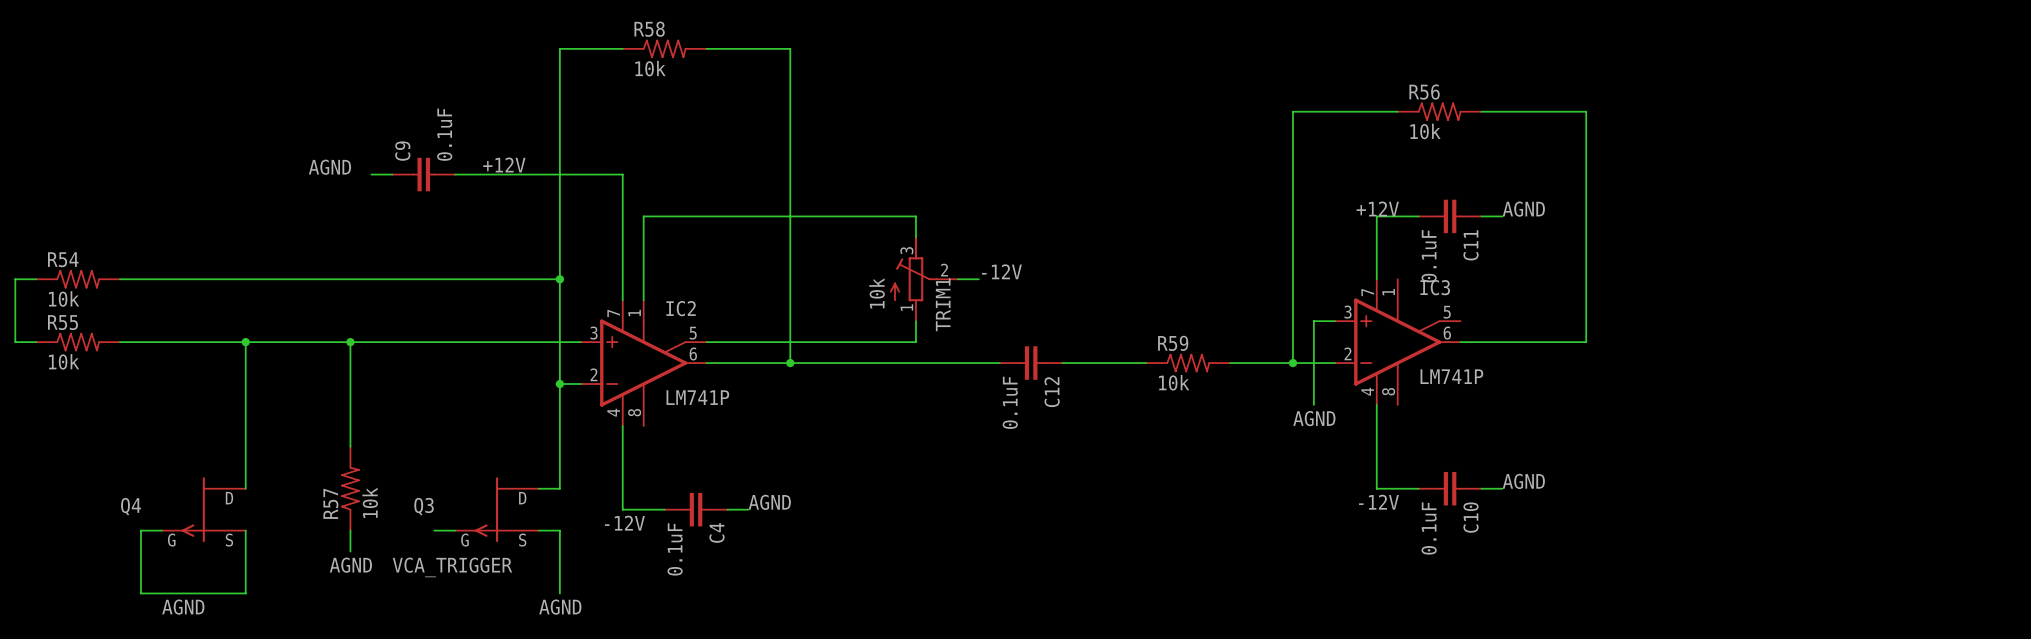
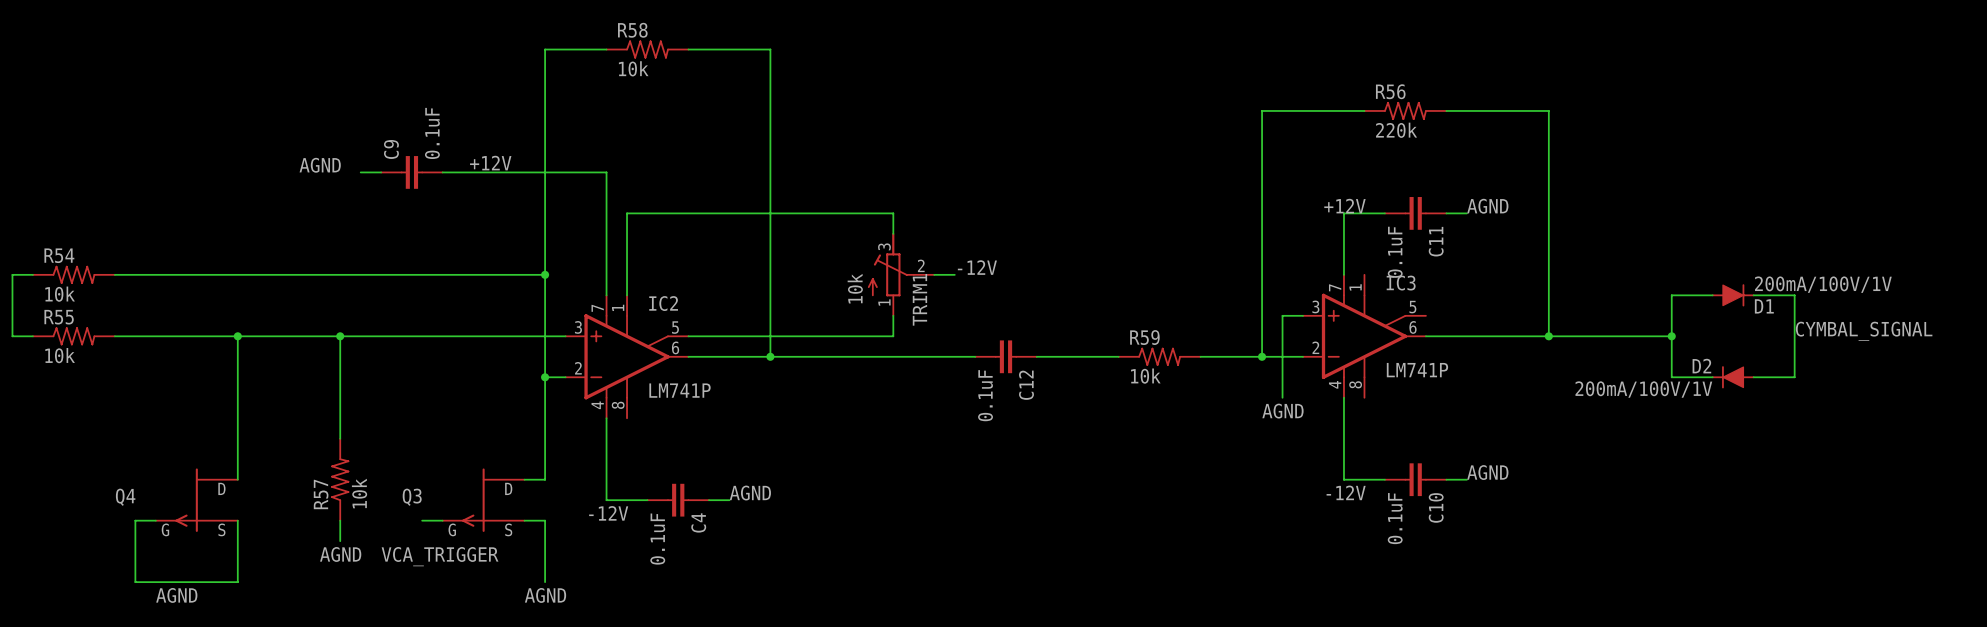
R56 value: 10k (1425, 131) -> 220k (1396, 130)
wire: none -> (1712, 295) (1671, 295) (1671, 377) (1712, 377)
D1: none -> 200mA/100V/1V (1733, 295)
wire: none -> (1753, 295) (1794, 295) (1794, 377) (1753, 377)
label: none -> CYMBAL_SIGNAL (1864, 331)
wire: none -> (1548, 336) (1671, 336)
junction: none -> (1548, 336)
junction: none -> (1671, 336)
D2: none -> 200mA/100V/1V (1733, 377)

